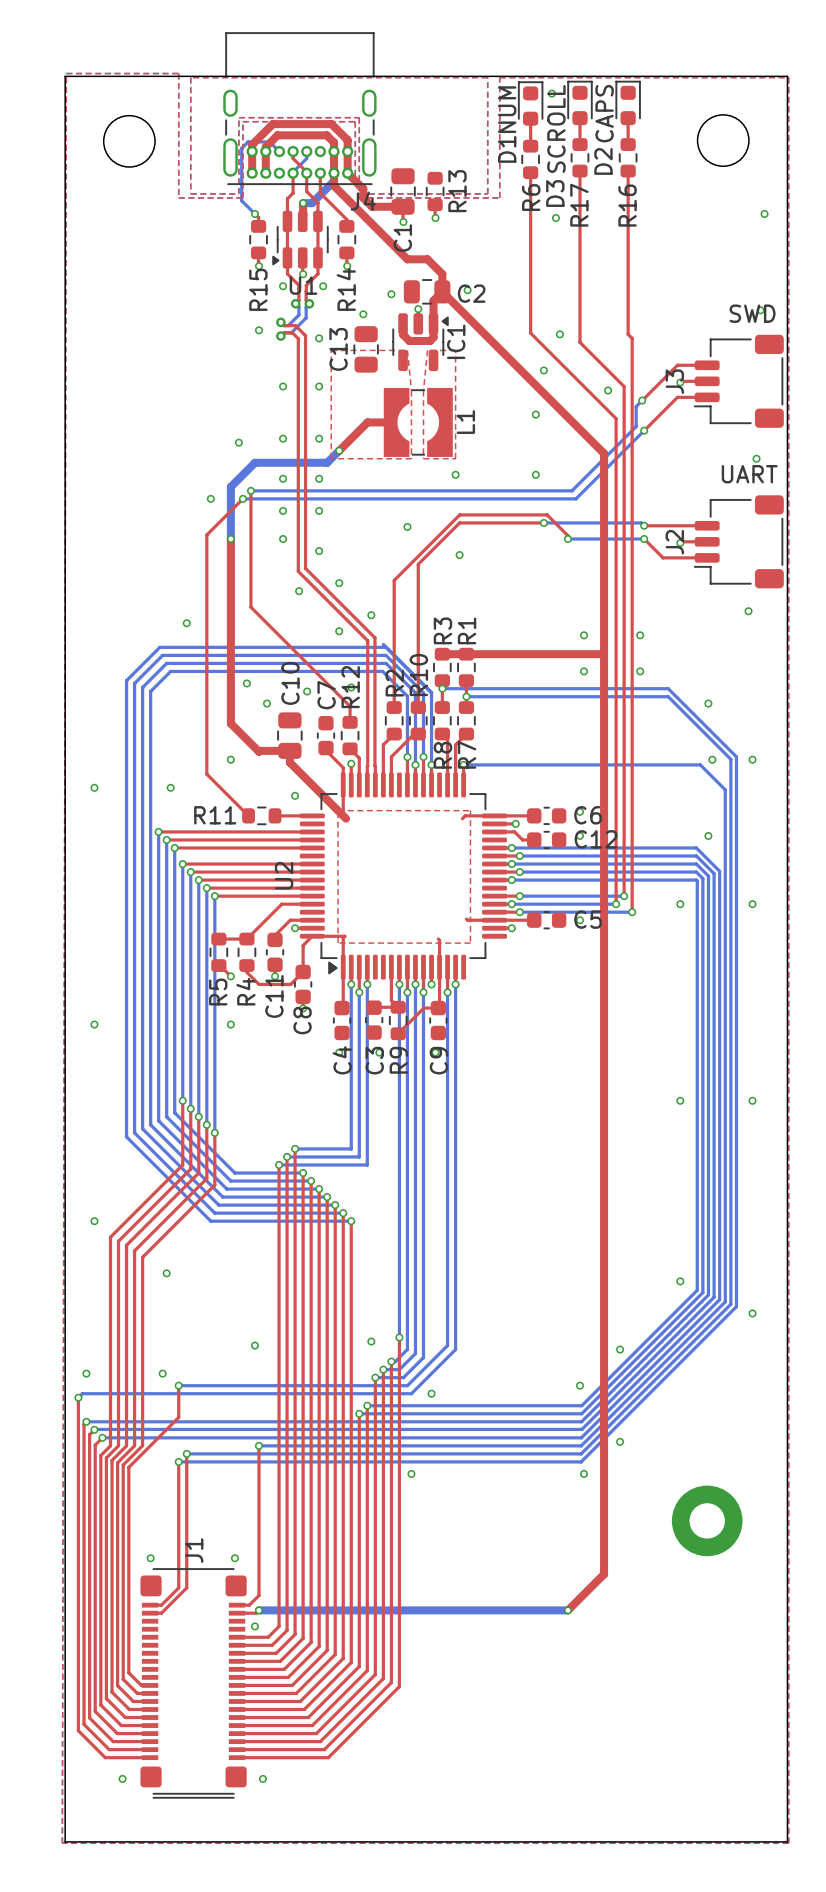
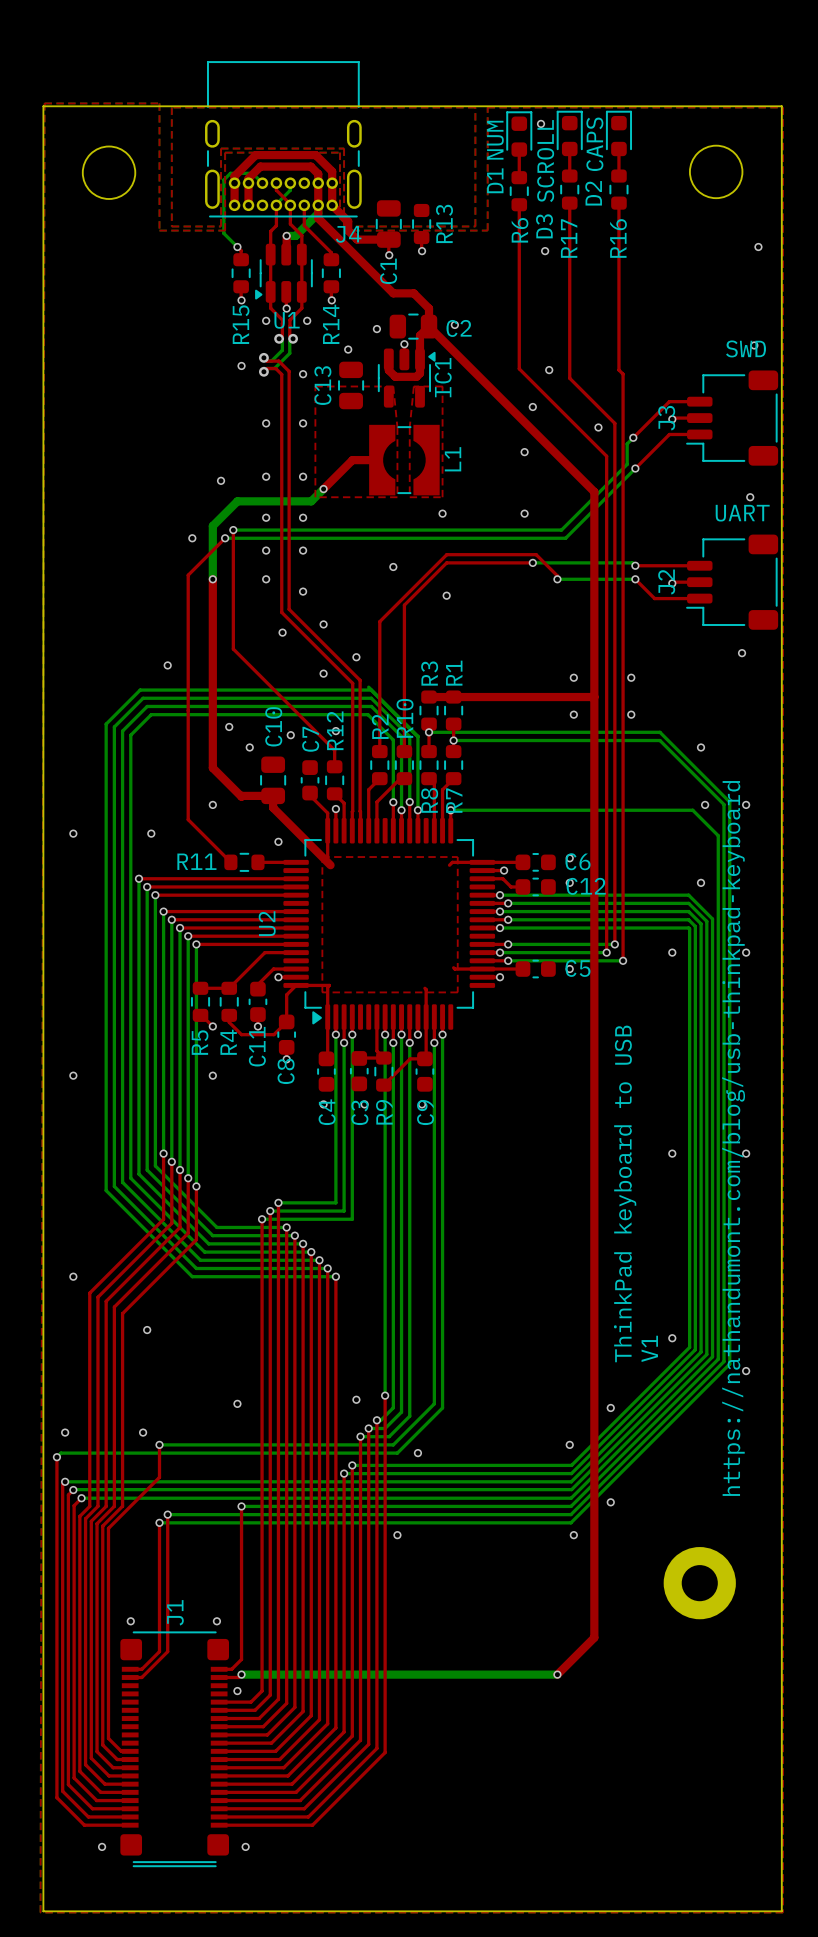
text: none -> https://nathandumont.com/blog/usb-thinkpad-keyboard (733, 1138)
text: none -> ThinkPad keyboard to USB (625, 1193)
text: none -> V1 (649, 1348)

